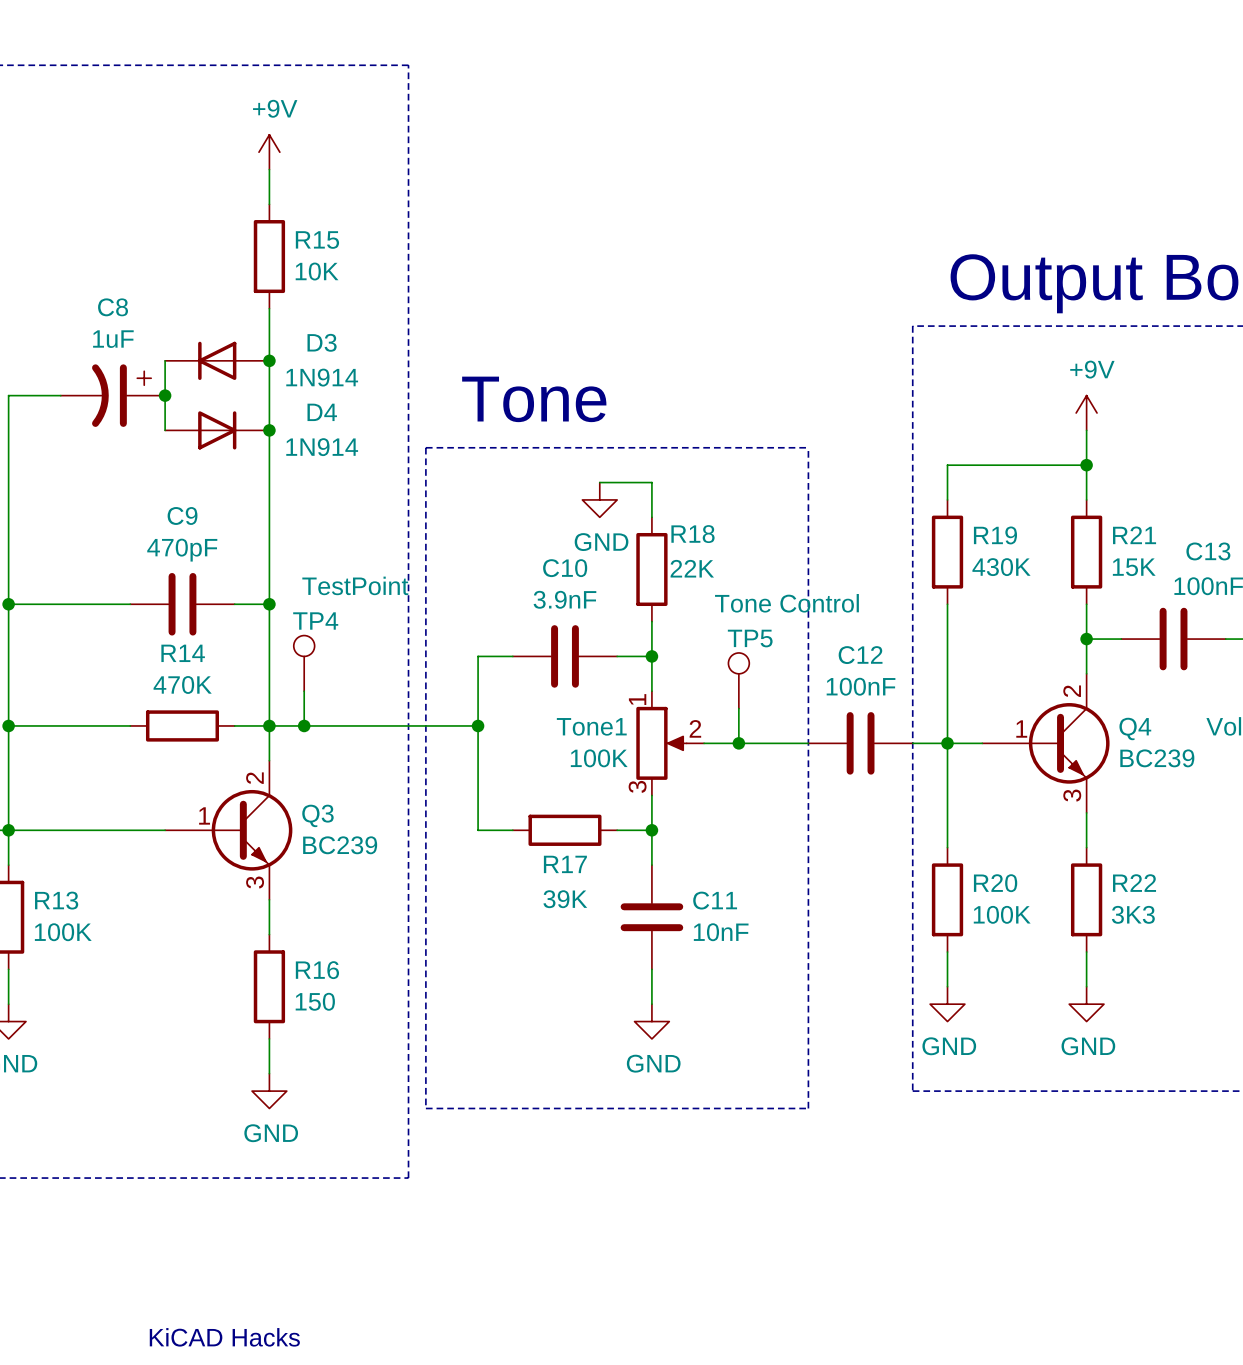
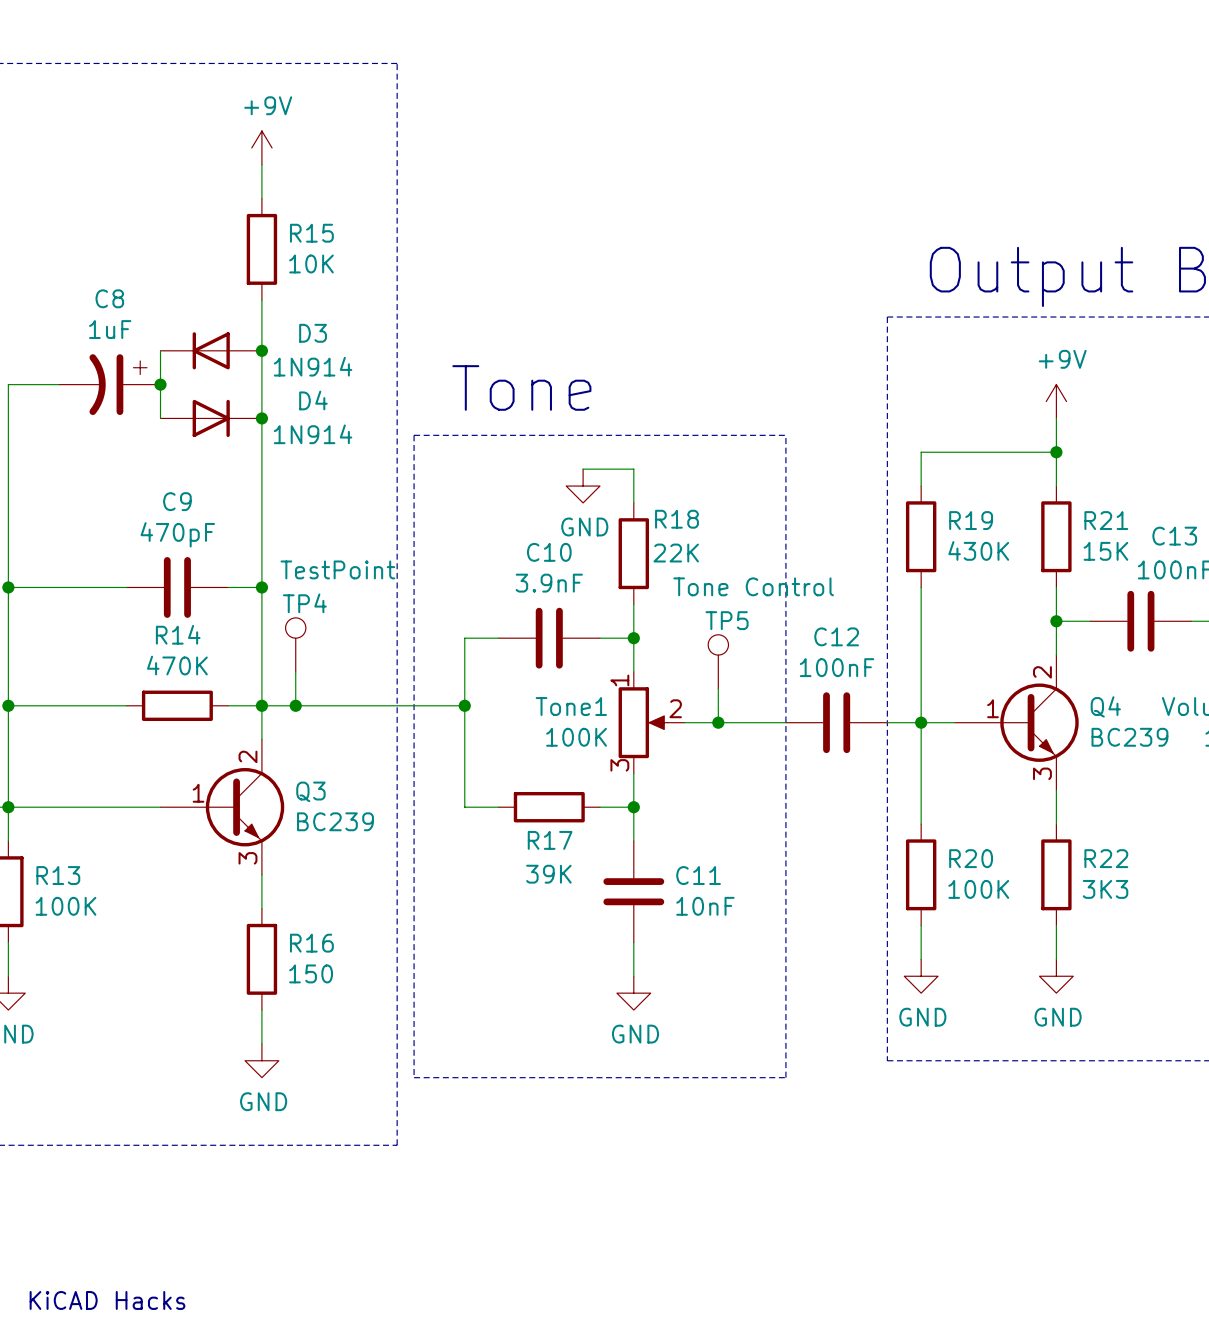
text position: KiCAD Hacks (224, 1337) -> KiCAD Hacks (107, 1300)

